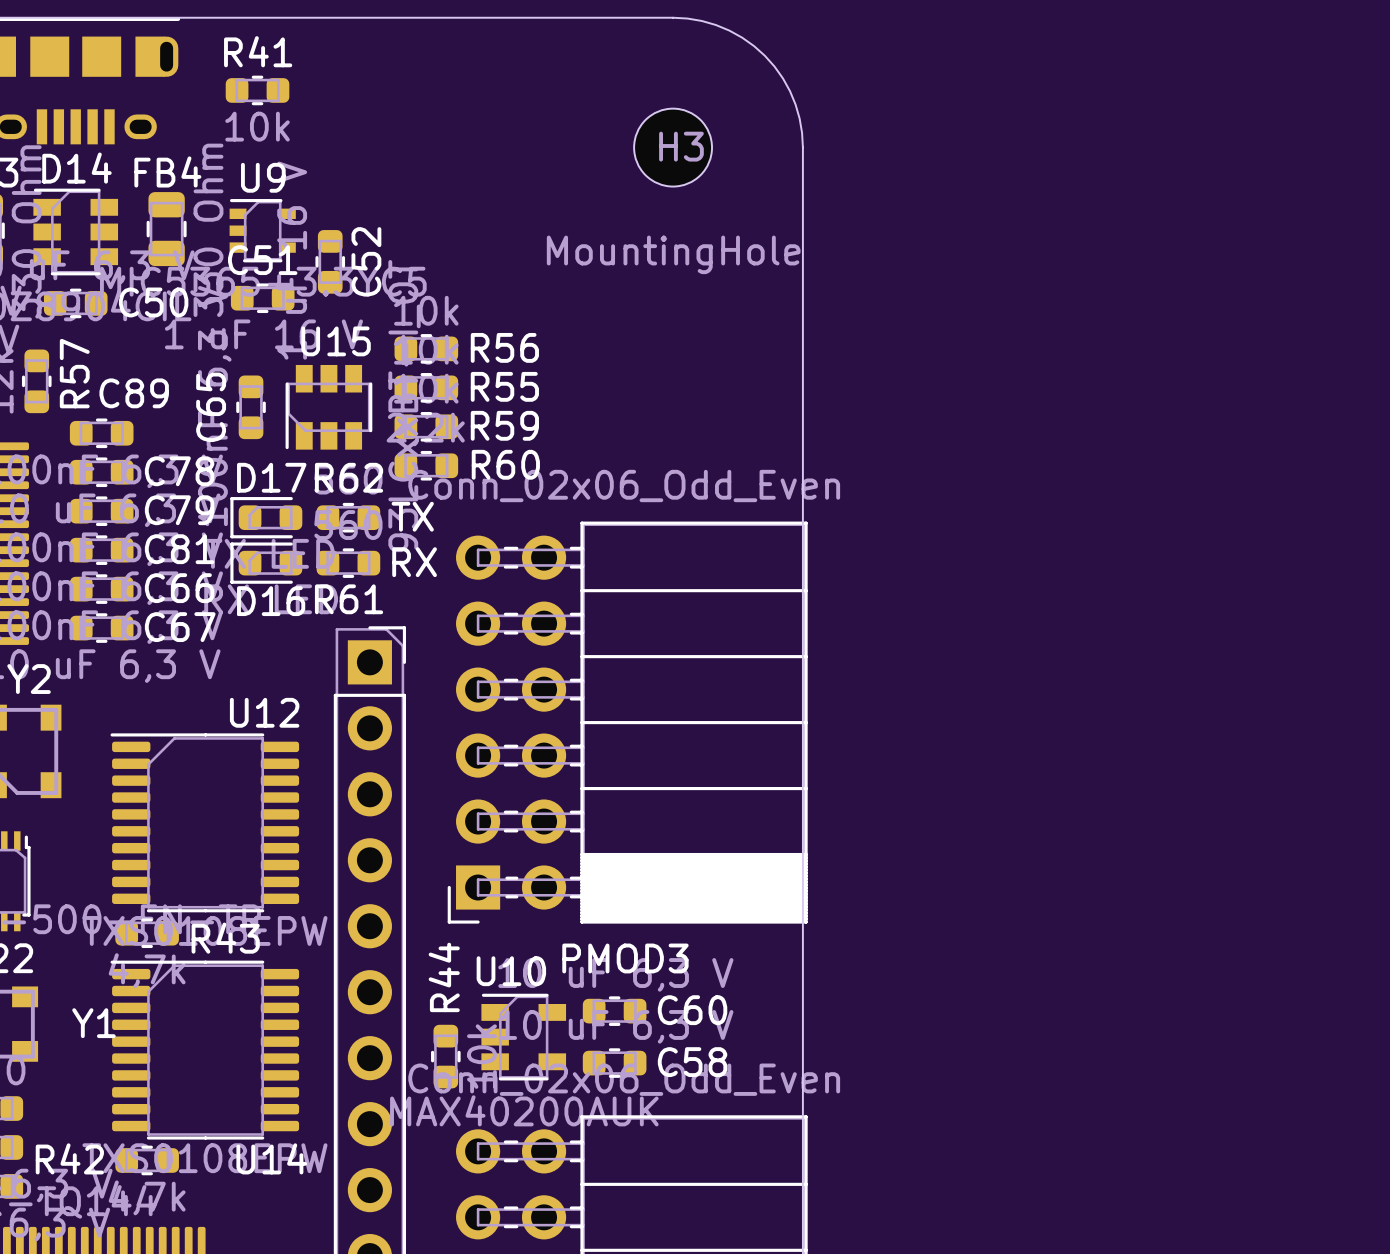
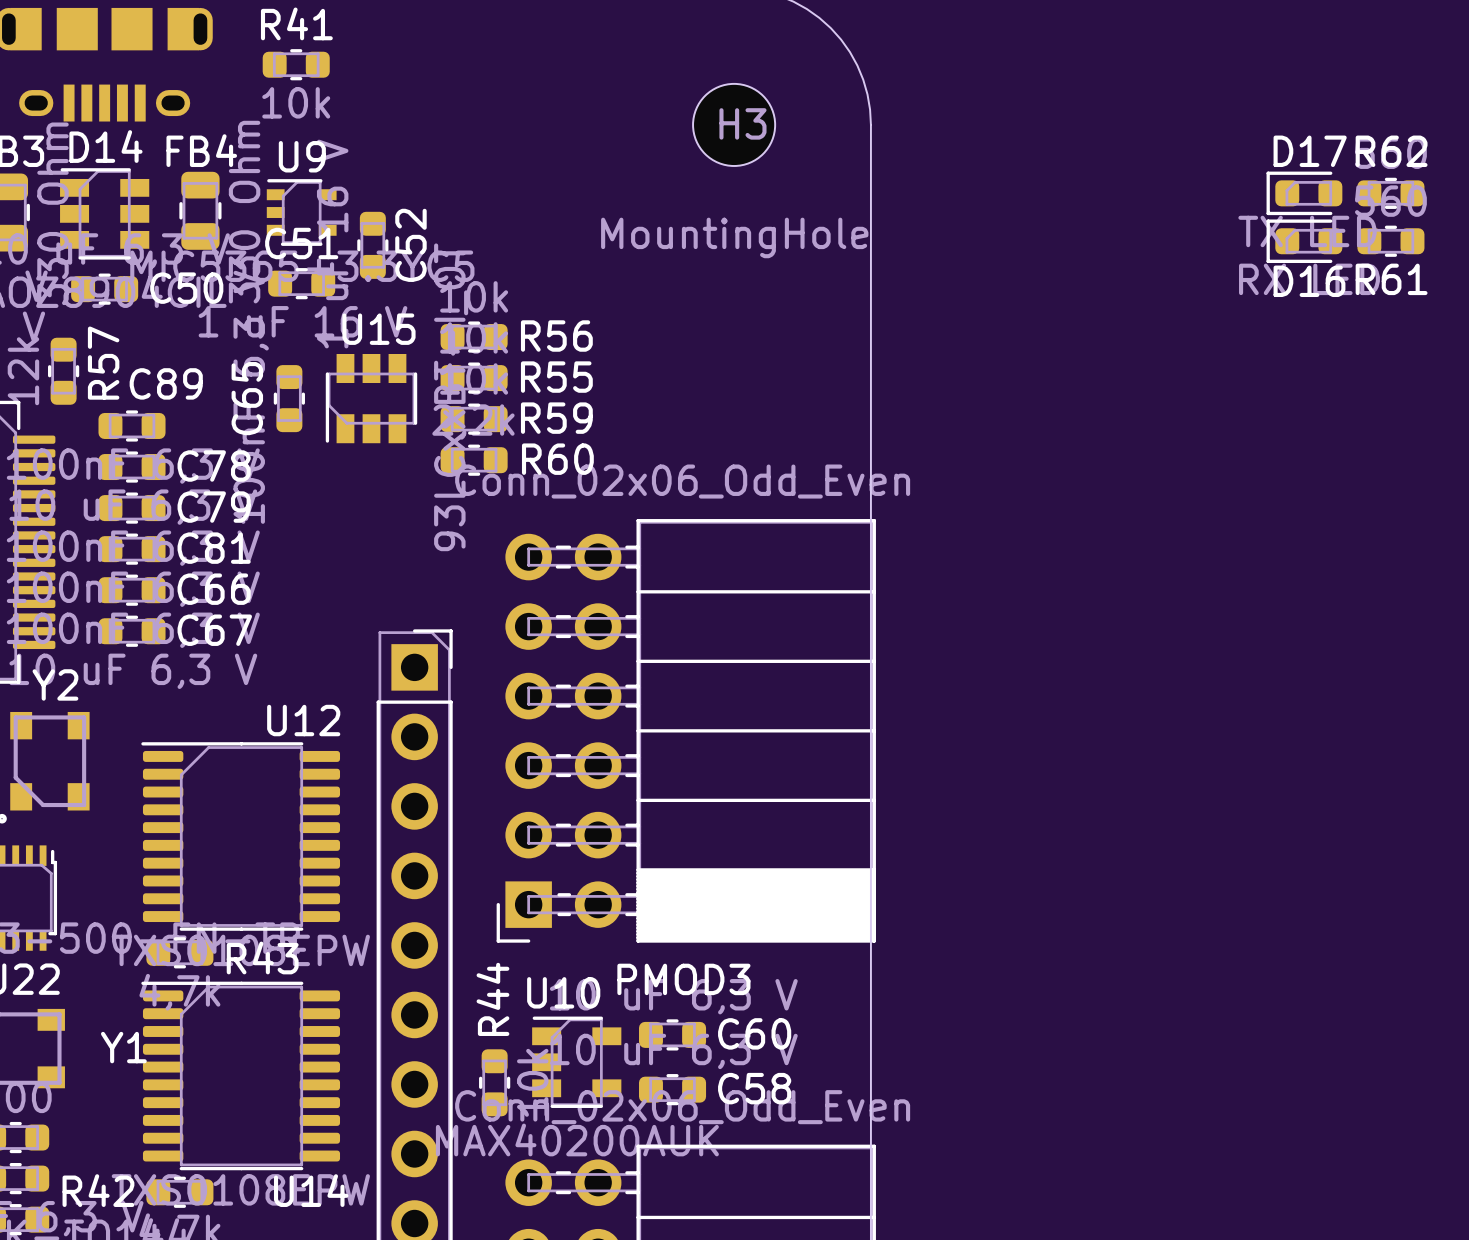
text: TX (412, 516) -> none
D17 position: (266, 517) -> (1304, 193)
R62 position: (348, 517) -> (1390, 193)
text: RX (414, 562) -> none
D16 position: (266, 563) -> (1304, 241)
R61 position: (348, 563) -> (1390, 241)

